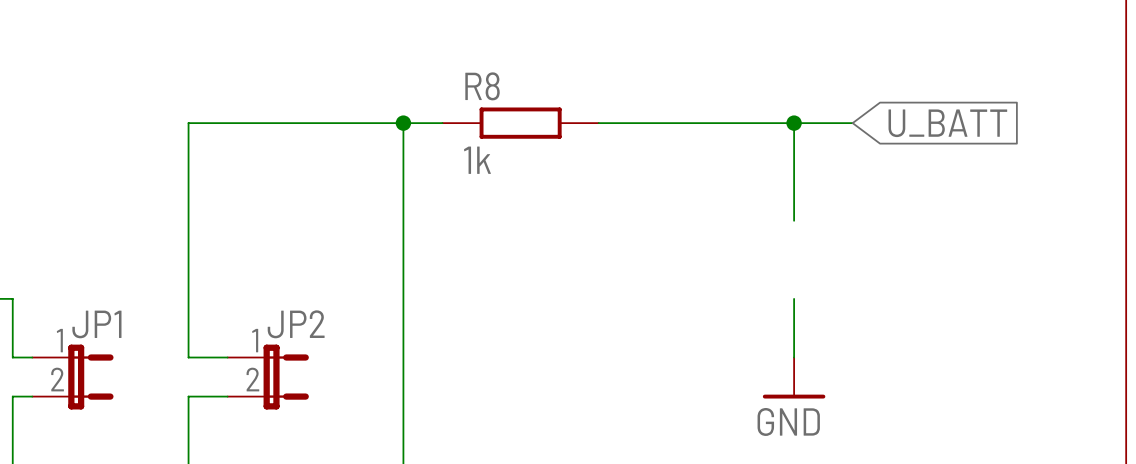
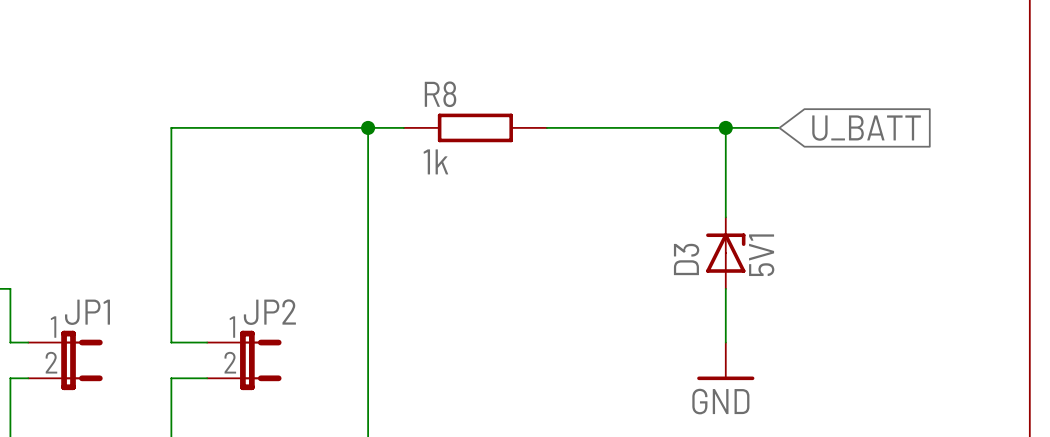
D3: none -> 5V1 (725, 253)

